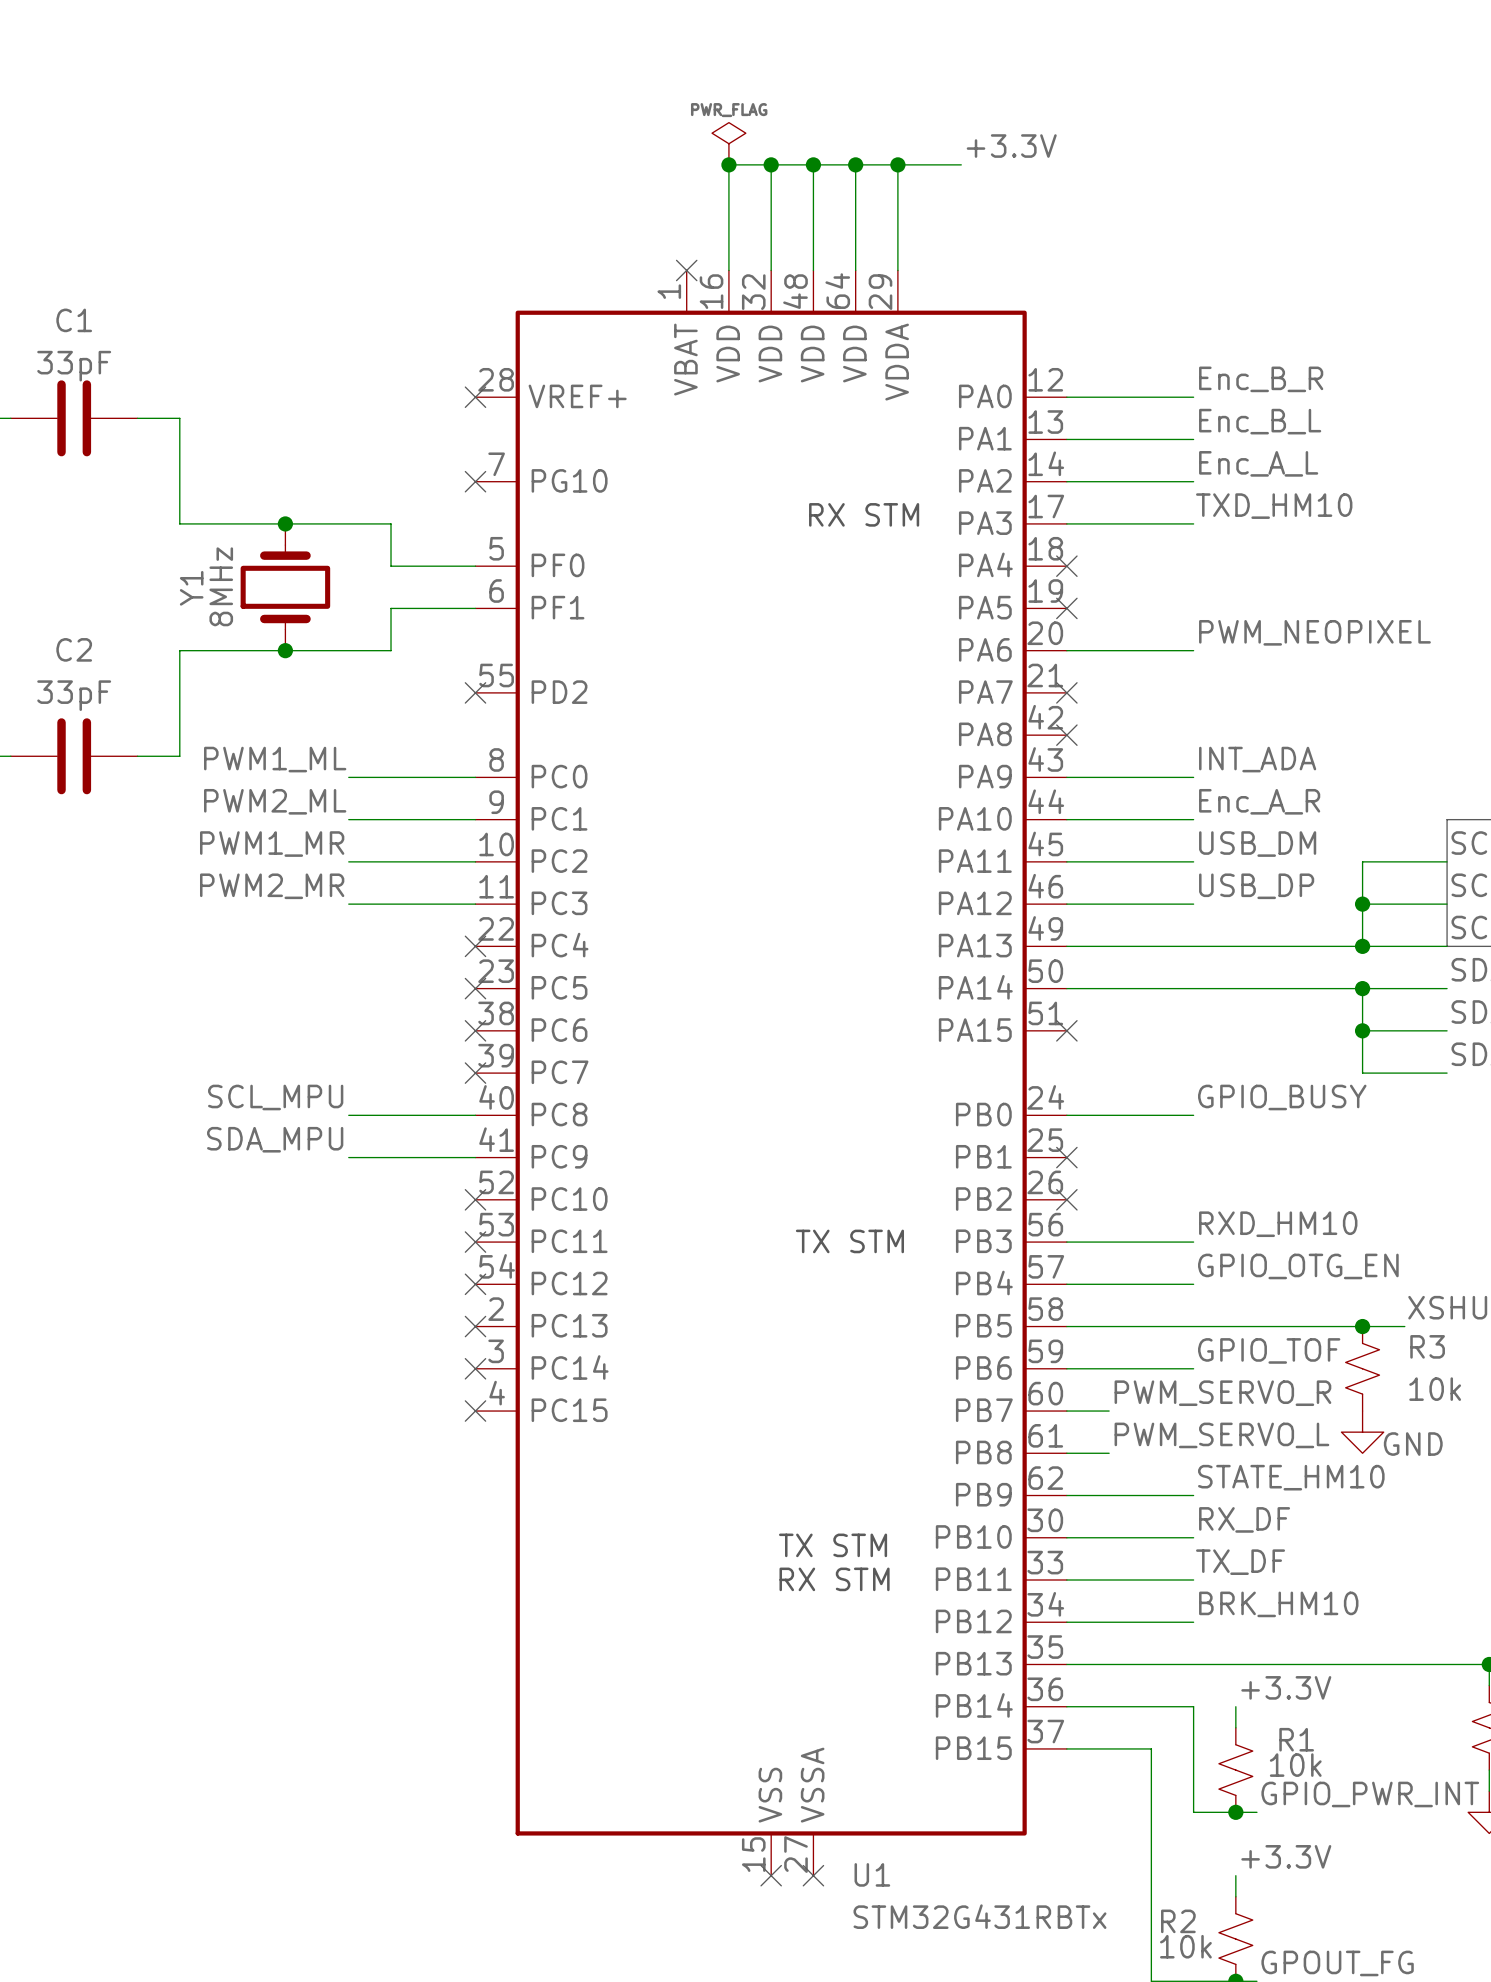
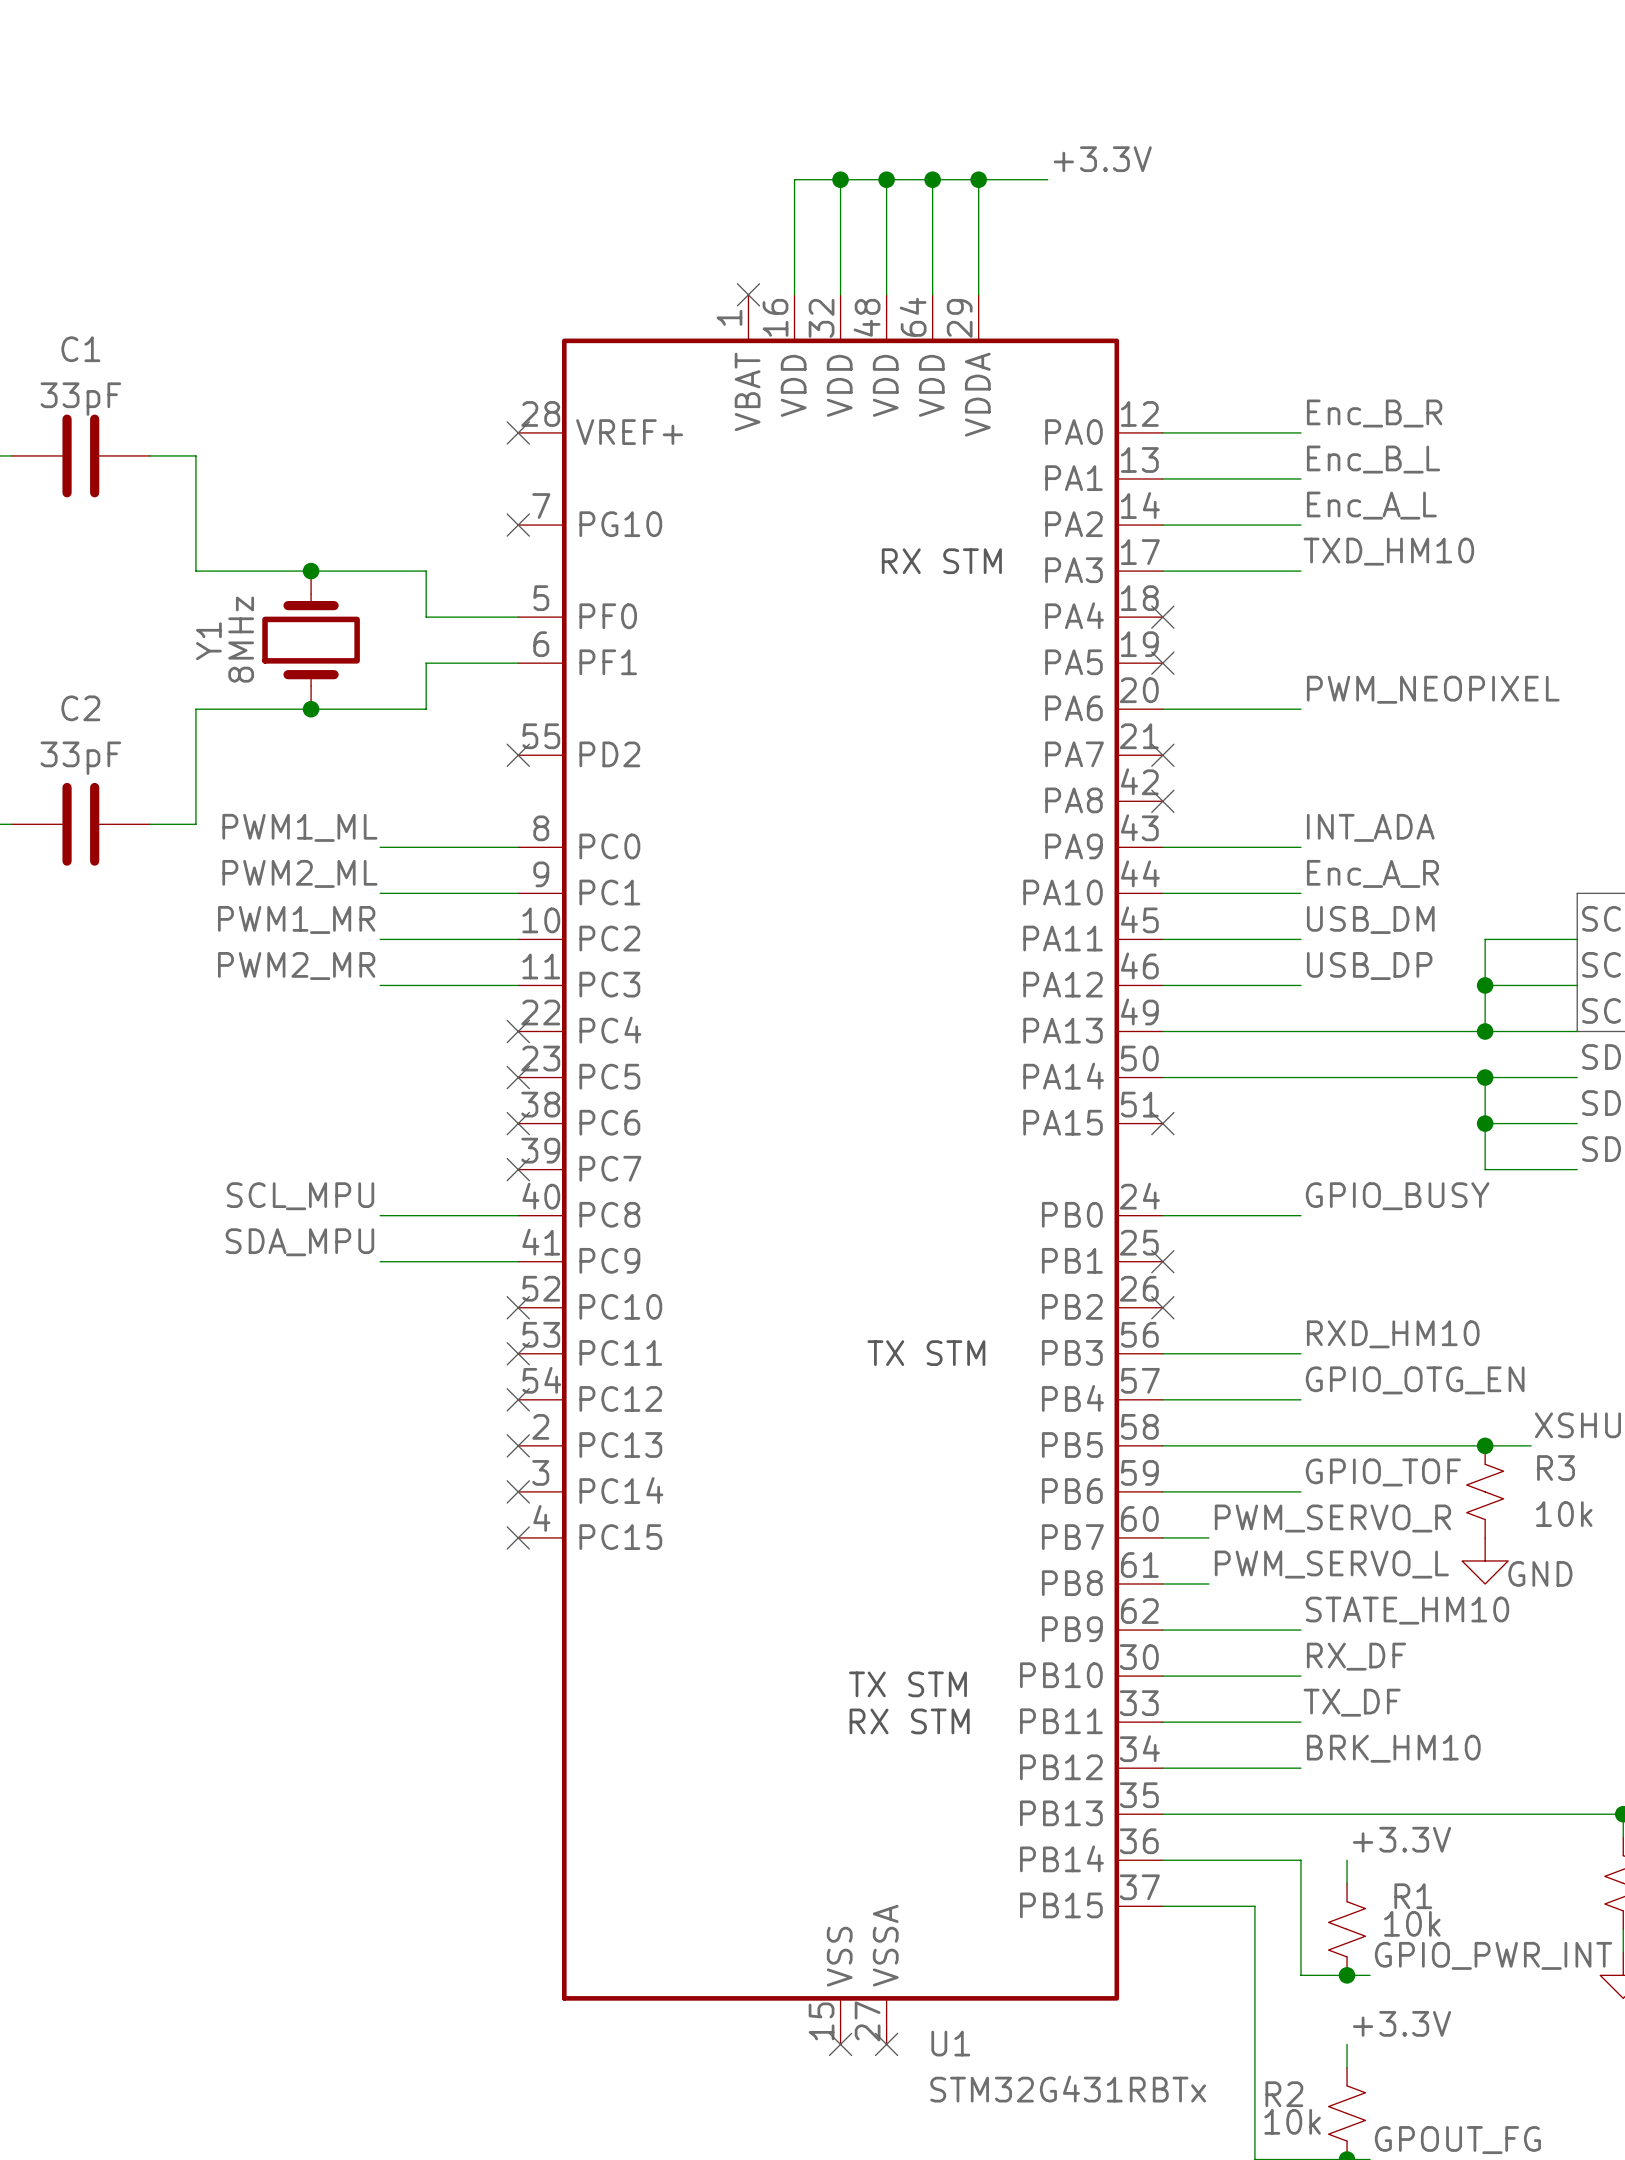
power symbol: PWR_FLAG (728, 143) -> none
junction: (728, 164) -> none

